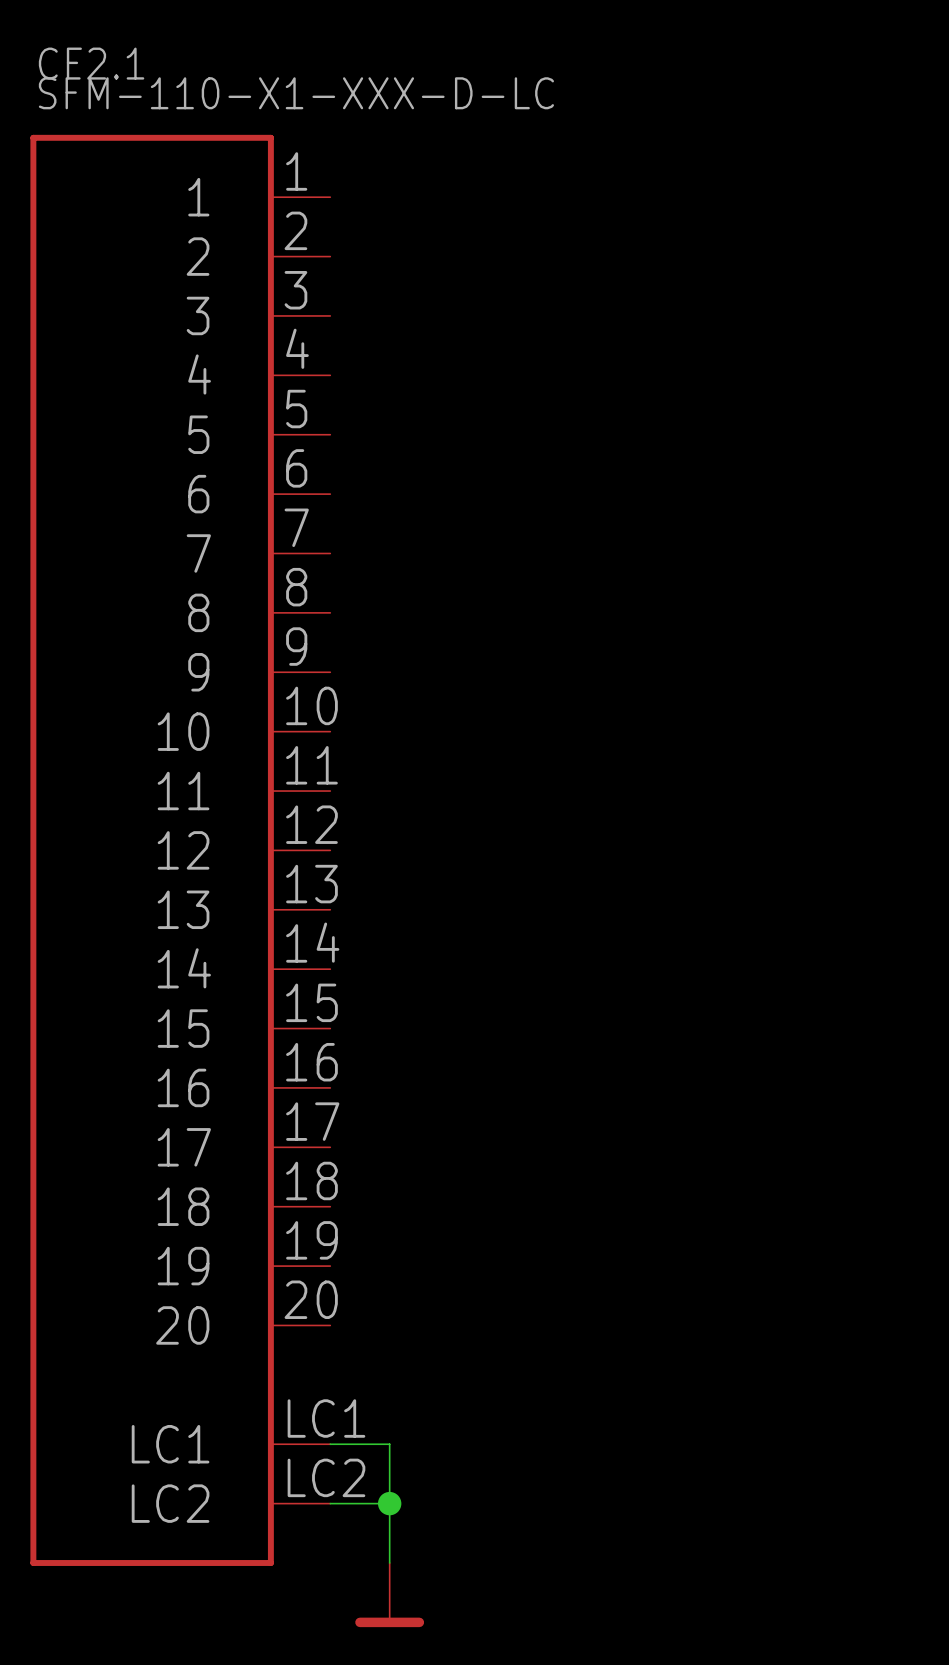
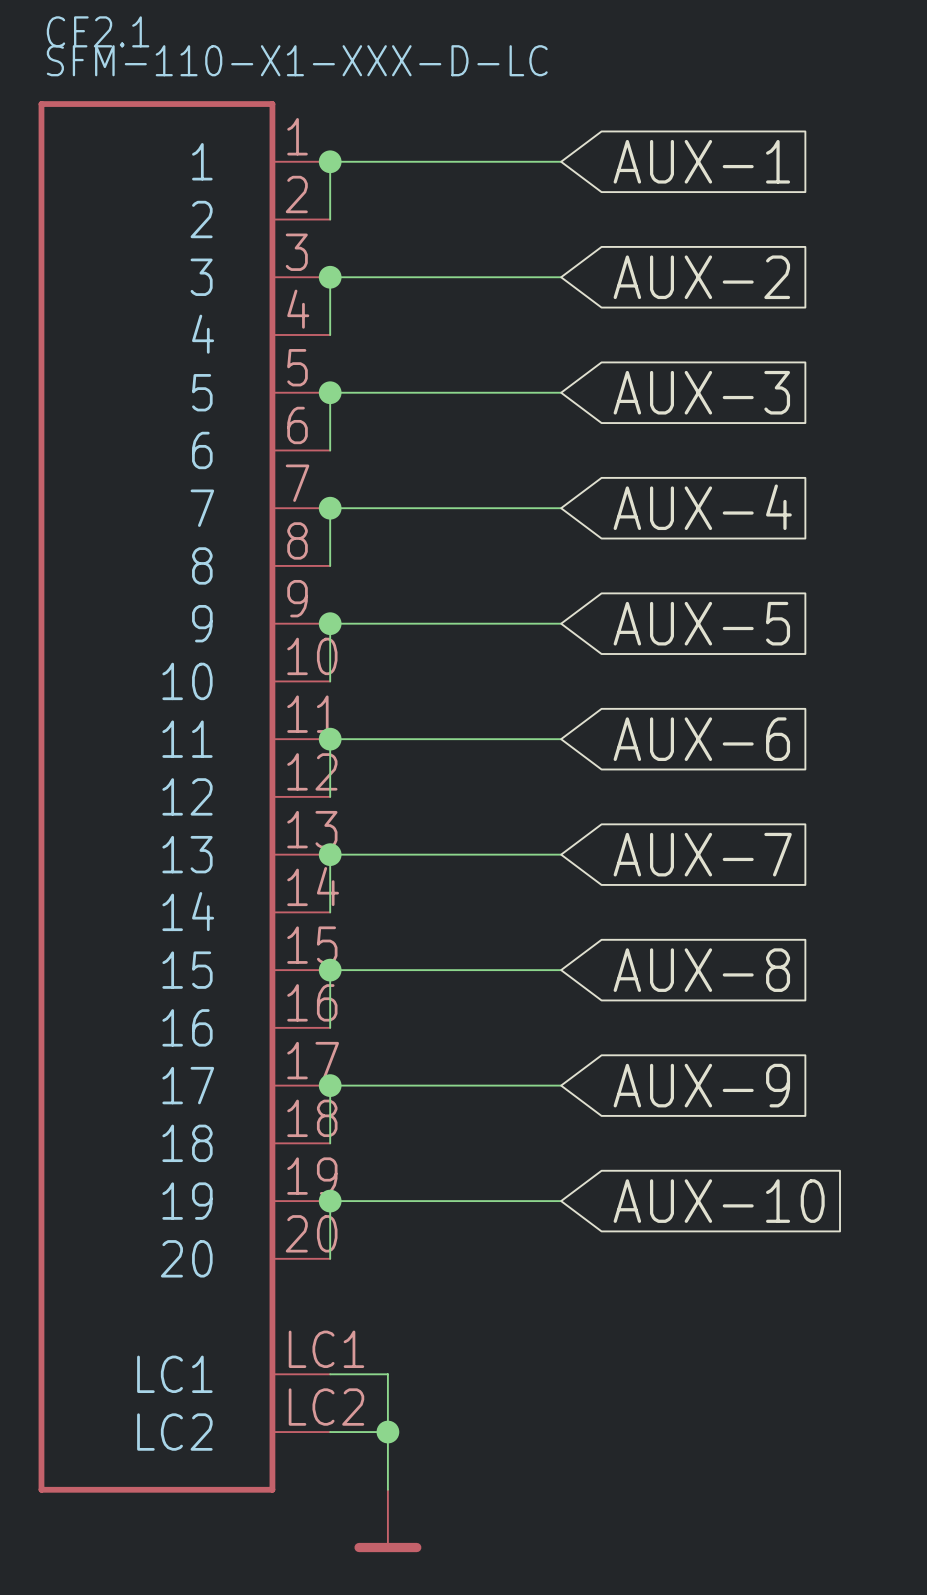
junction: none -> (330, 161)
wire: none -> (561, 161) (330, 161) (330, 219)
global label: none -> AUX-1 (701, 161)
junction: none -> (330, 277)
wire: none -> (561, 277) (330, 277) (330, 334)
global label: none -> AUX-2 (701, 277)
junction: none -> (330, 392)
wire: none -> (561, 392) (330, 392) (330, 450)
global label: none -> AUX-3 (701, 392)
global label: none -> AUX-4 (702, 507)
junction: none -> (330, 508)
wire: none -> (561, 508) (330, 508) (330, 565)
junction: none -> (330, 623)
wire: none -> (561, 623) (330, 623) (330, 681)
global label: none -> AUX-5 (701, 623)
junction: none -> (330, 739)
wire: none -> (561, 739) (330, 739) (330, 796)
global label: none -> AUX-6 (701, 739)
junction: none -> (330, 854)
wire: none -> (561, 854) (330, 854) (330, 912)
global label: none -> AUX-7 (702, 854)
junction: none -> (330, 970)
wire: none -> (561, 970) (330, 970) (330, 1027)
global label: none -> AUX-8 (701, 970)
junction: none -> (330, 1085)
wire: none -> (561, 1085) (330, 1085) (330, 1143)
global label: none -> AUX-9 (701, 1085)
junction: none -> (330, 1201)
wire: none -> (561, 1201) (330, 1201) (330, 1258)
global label: none -> AUX-10 (719, 1201)

